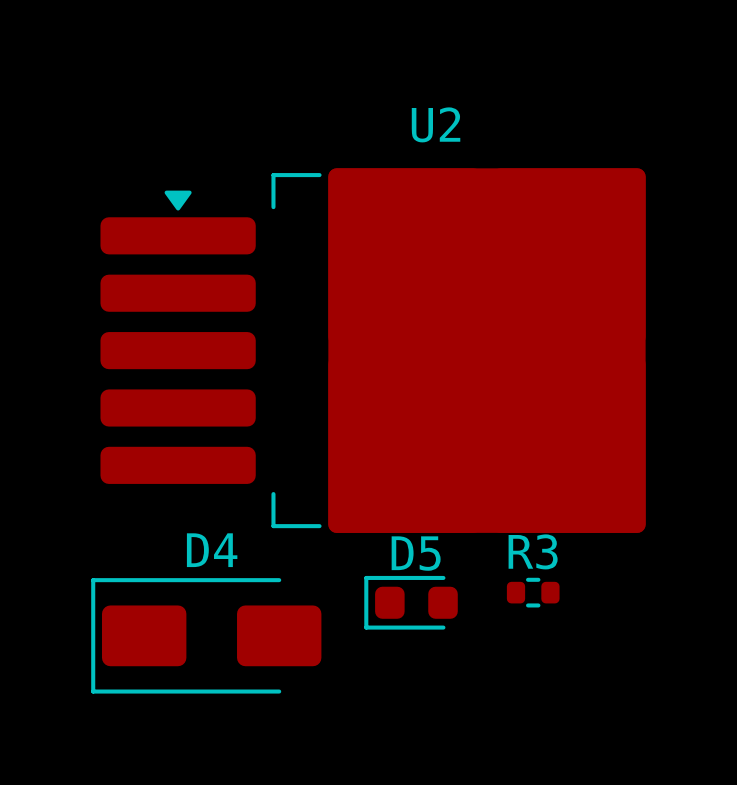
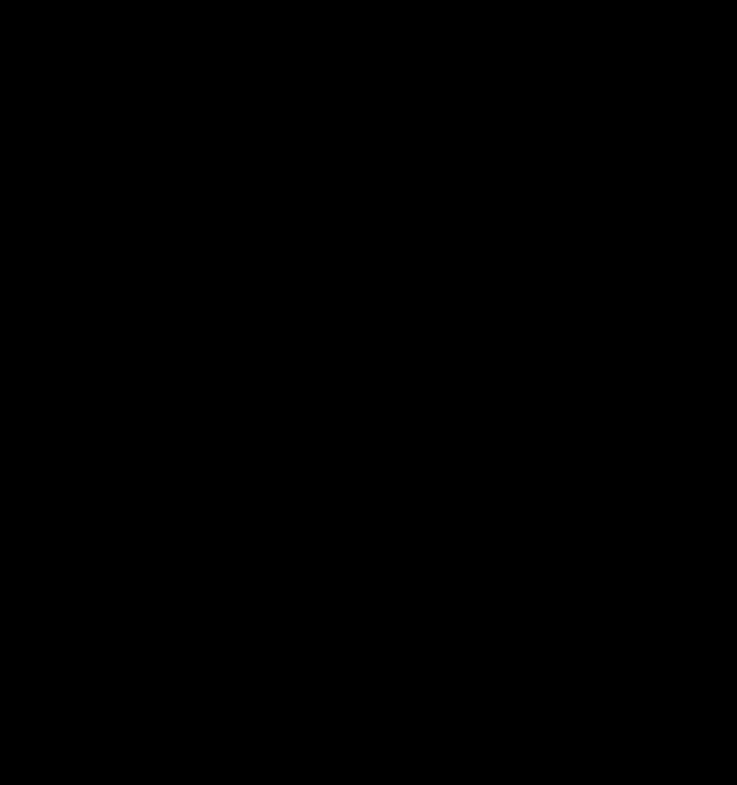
U2: (373, 350) -> none
R3: (533, 592) -> none
D5: (411, 602) -> none
D4: (206, 635) -> none

